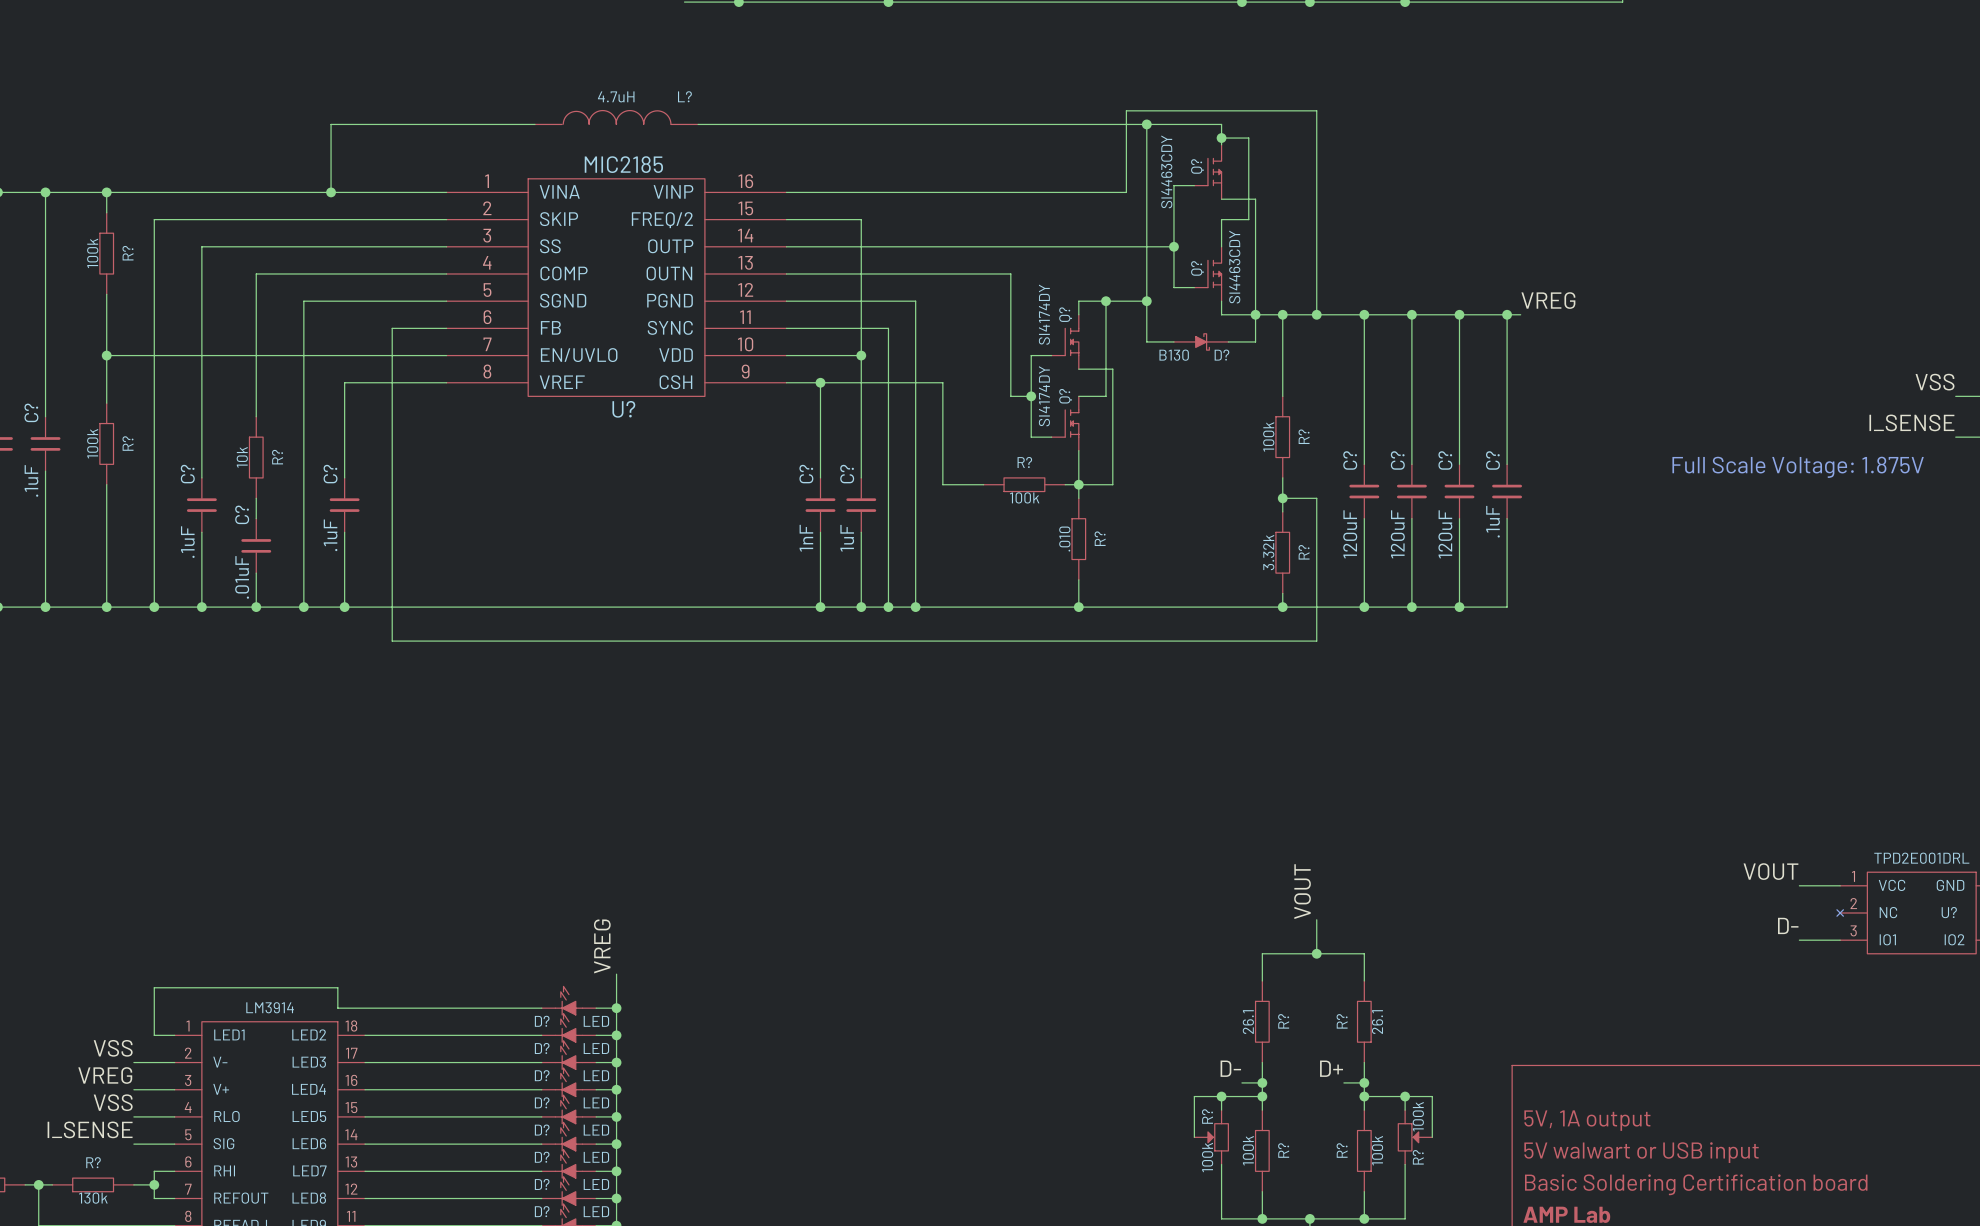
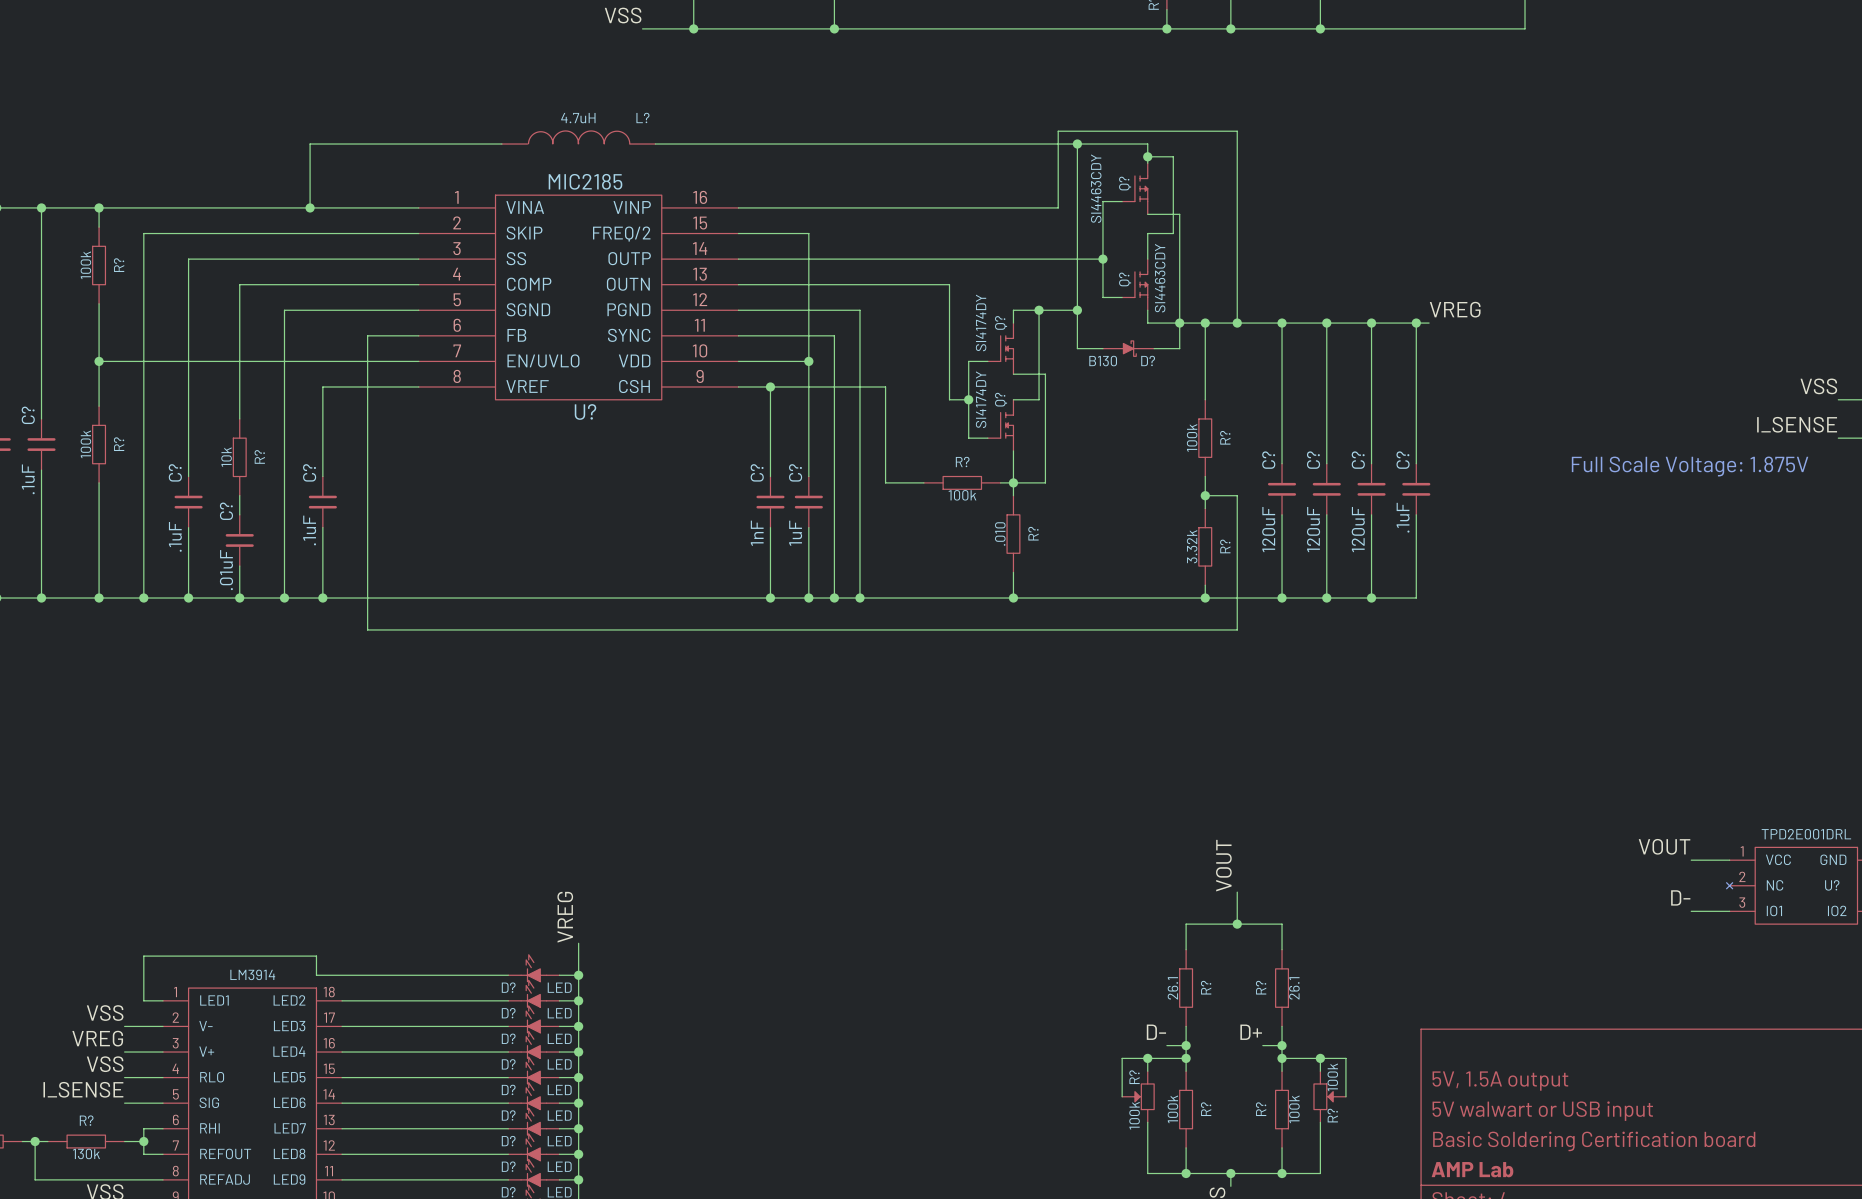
title block: 5V, 1A output (1587, 1120) -> 5V, 1.5A output (1500, 1081)

